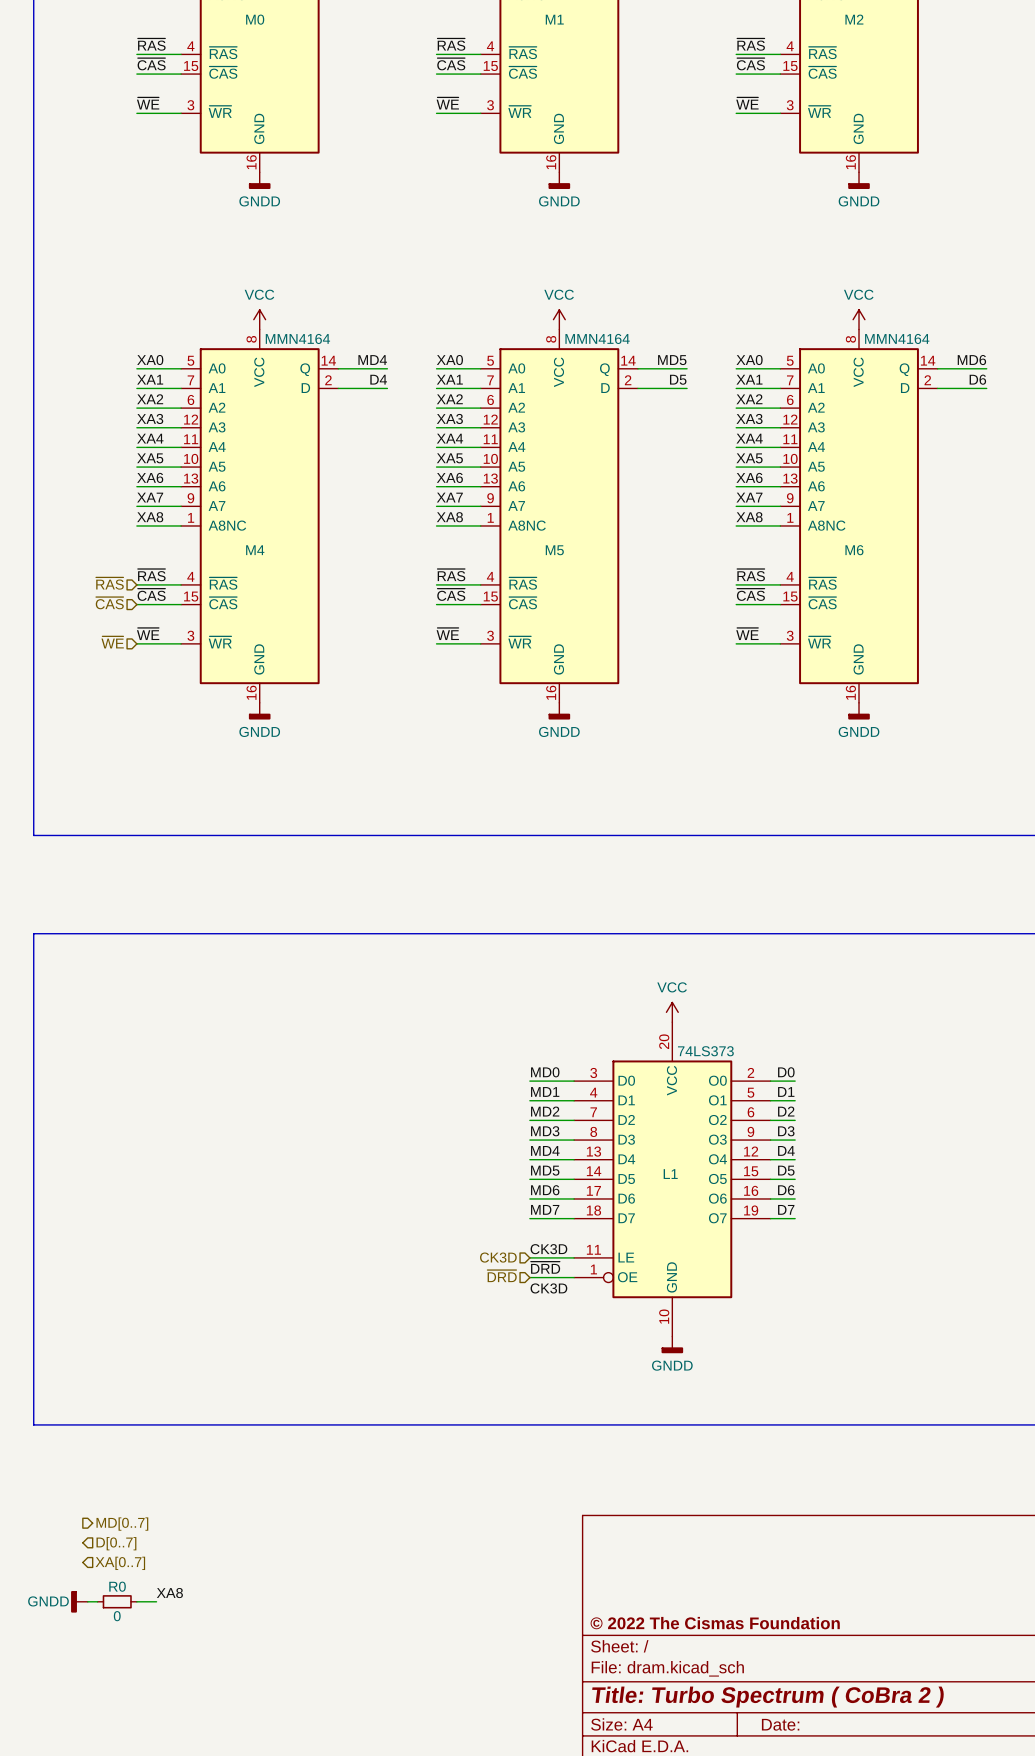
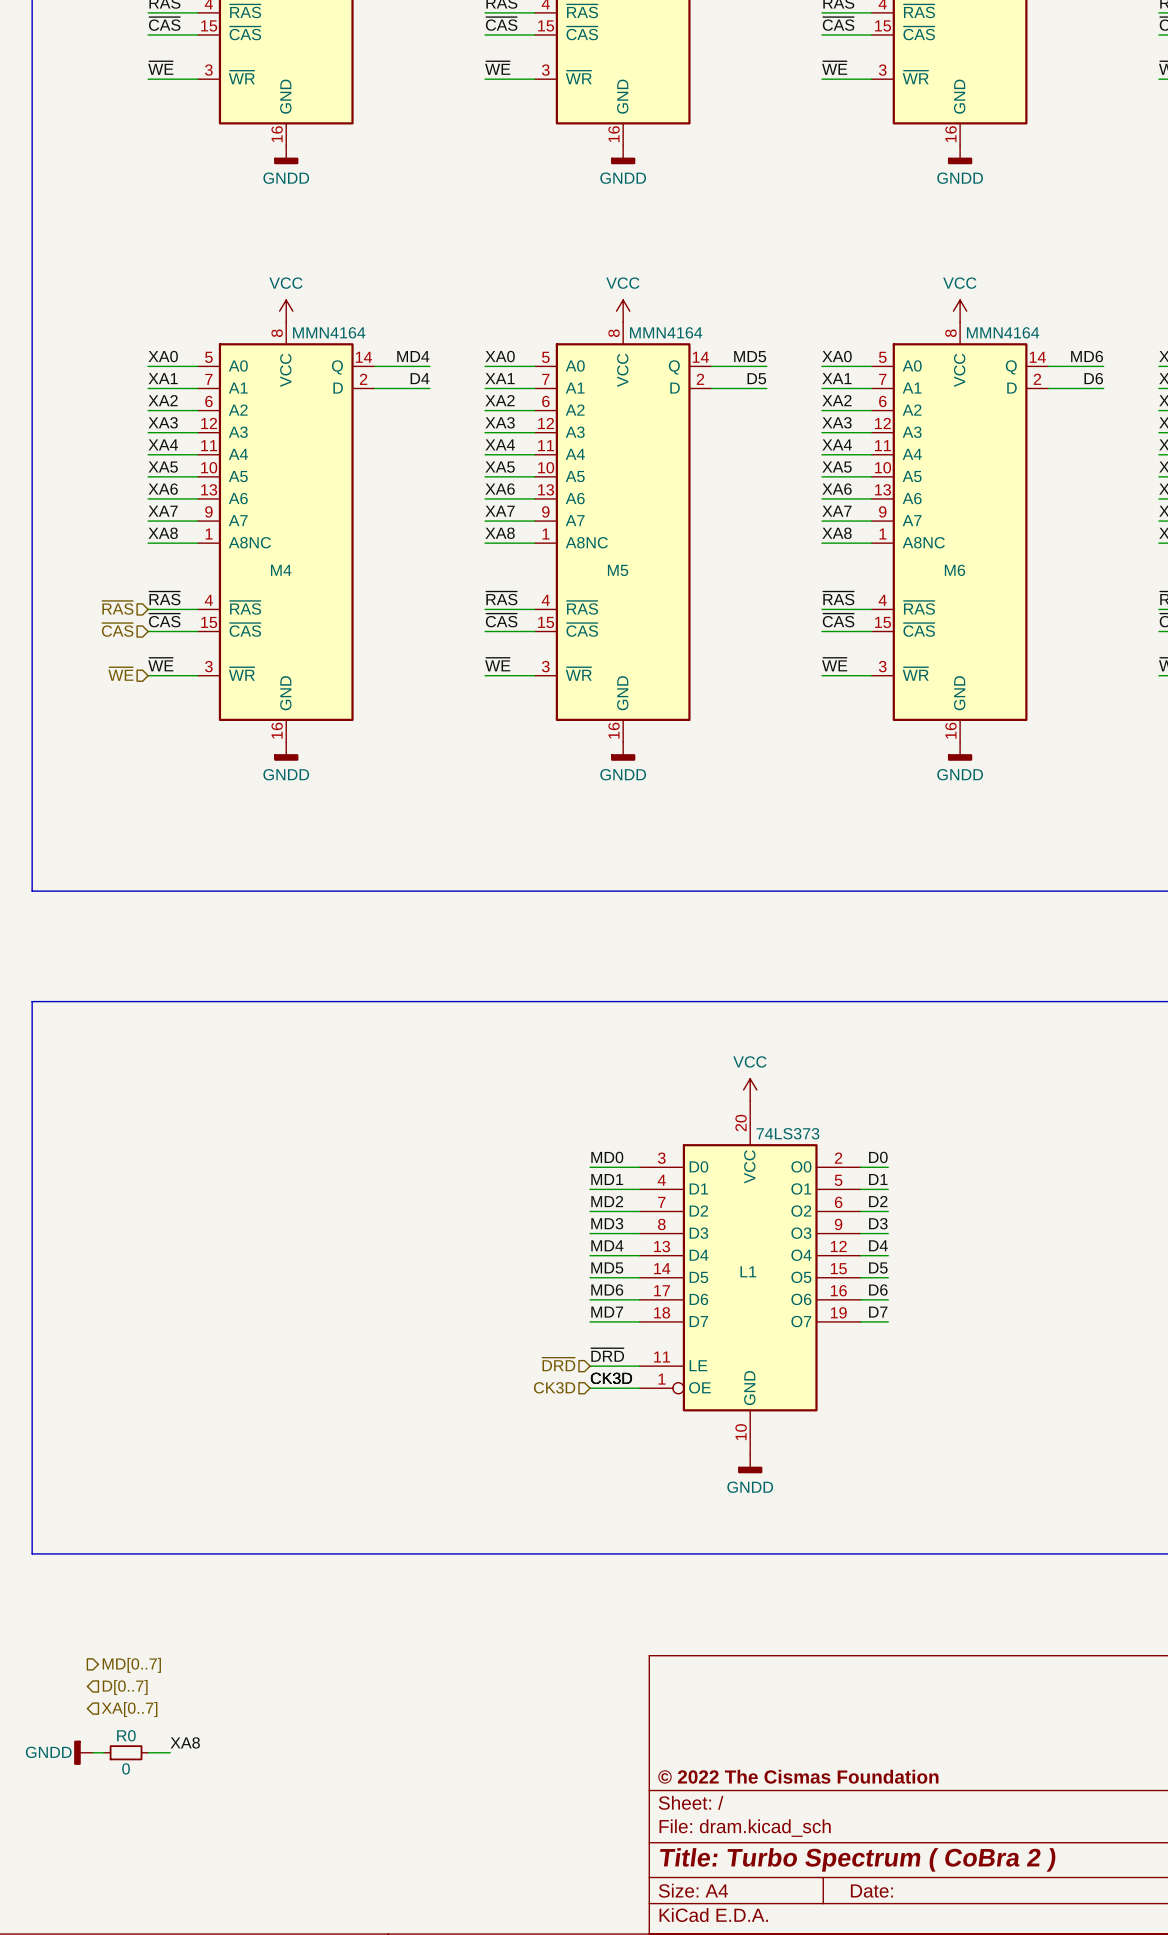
label: CK3D (548, 1249) -> ~{DRD} (607, 1355)
hierarchical label: CK3D (498, 1257) -> ~{DRD} (558, 1364)
label: ~{DRD} (545, 1267) -> CK3D (611, 1378)
hierarchical label: ~{DRD} (502, 1276) -> CK3D (554, 1387)
label: CK3D (548, 1288) -> none

